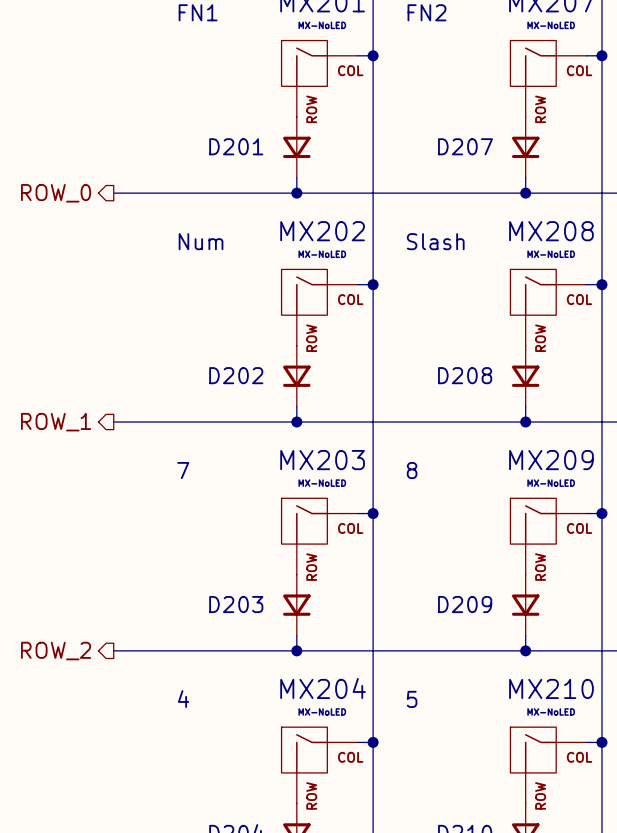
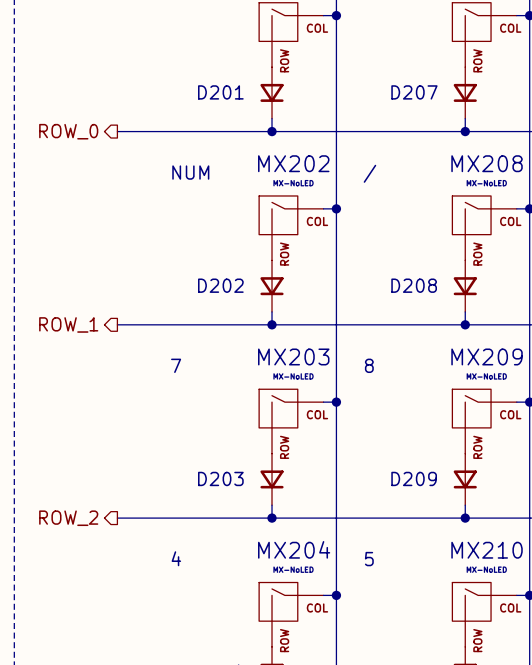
text: Num (201, 241) -> NUM (190, 172)
text: Slash (435, 241) -> / (369, 173)

